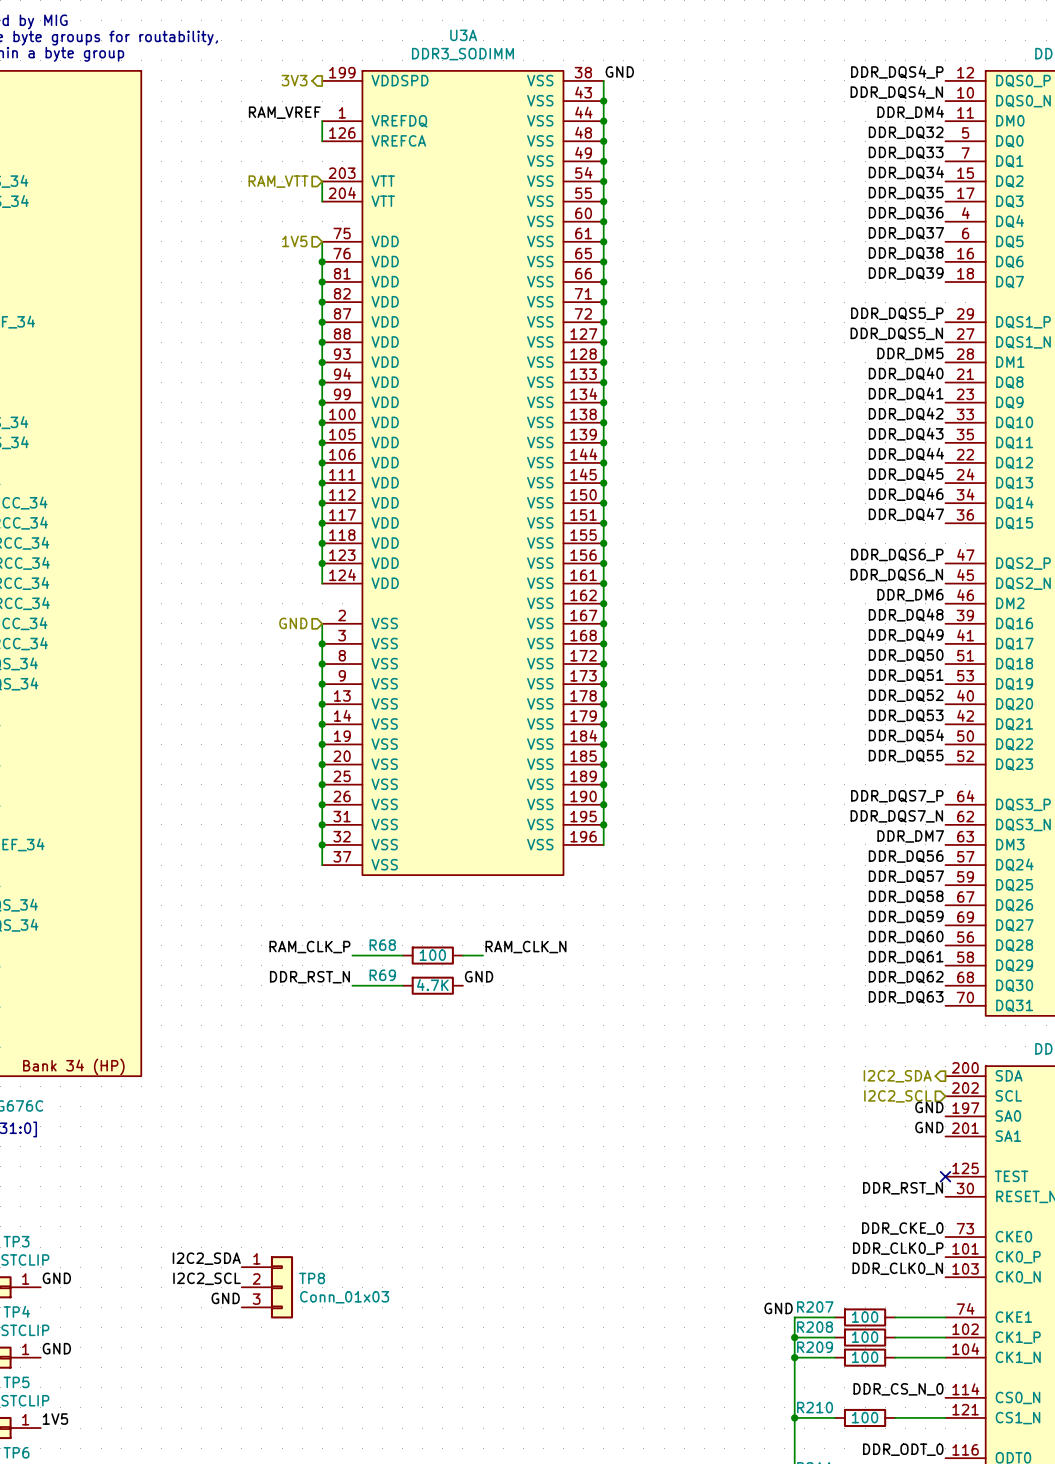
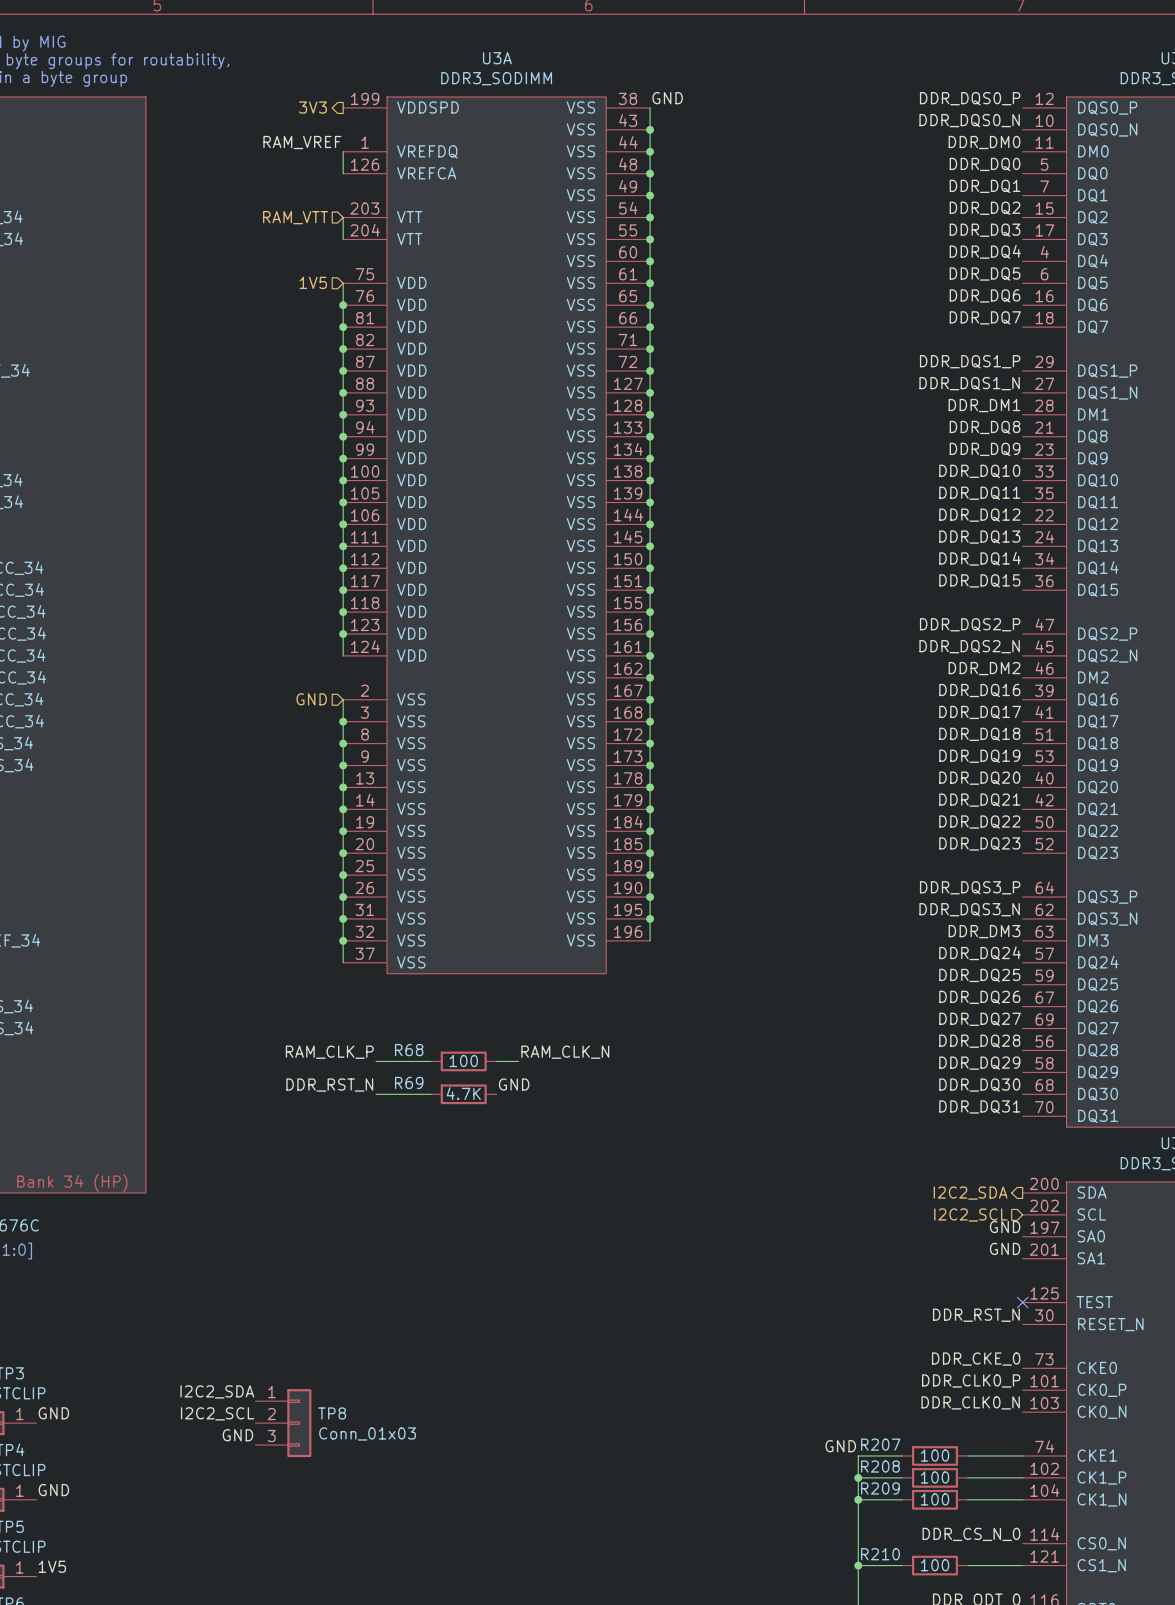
label: DDR_DQS4_P (897, 72) -> DDR_DQS0_P (970, 98)
label: DDR_DQS4_N (896, 92) -> DDR_DQS0_N (969, 120)
label: DDR_DM4 (910, 112) -> DDR_DM0 (984, 142)
label: DDR_DQ32 (906, 132) -> DDR_DQ0 (985, 164)
label: DDR_DQ33 (906, 152) -> DDR_DQ1 (985, 186)
label: DDR_DQ34 (906, 172) -> DDR_DQ2 (985, 208)
label: DDR_DQ35 (906, 193) -> DDR_DQ3 (985, 230)
label: DDR_DQ36 (906, 213) -> DDR_DQ4 (985, 251)
label: DDR_DQ37 (906, 233) -> DDR_DQ5 (985, 274)
label: DDR_DQ38 (906, 253) -> DDR_DQ6 (985, 295)
label: DDR_DQ39 (906, 273) -> DDR_DQ7 (985, 317)
label: DDR_DQS5_P (897, 313) -> DDR_DQS1_P (970, 361)
label: DDR_DQS5_N (896, 333) -> DDR_DQS1_N (969, 383)
label: DDR_DM5 (910, 353) -> DDR_DM1 (984, 405)
label: DDR_DQ40 (906, 373) -> DDR_DQ8 (985, 427)
label: DDR_DQ41 (906, 393) -> DDR_DQ9 (985, 449)
label: DDR_DQ42 (906, 414) -> DDR_DQ10 (979, 471)
label: DDR_DQ43 (906, 434) -> DDR_DQ11 (979, 493)
label: DDR_DQ44 (906, 454) -> DDR_DQ12 (979, 515)
label: DDR_DQ45 (906, 474) -> DDR_DQ13 (979, 537)
label: DDR_DQ46 (906, 494) -> DDR_DQ14 (980, 558)
label: DDR_DQ47 (906, 514) -> DDR_DQ15 (979, 580)
label: DDR_DQS6_P (897, 555) -> DDR_DQS2_P (970, 624)
label: DDR_DQS6_N (896, 575) -> DDR_DQS2_N (969, 646)
label: DDR_DM6 (910, 595) -> DDR_DM2 (984, 668)
label: DDR_DQ48 (906, 615) -> DDR_DQ16 (979, 690)
label: DDR_DQ49 (906, 635) -> DDR_DQ17 (980, 712)
label: DDR_DQ50 (906, 655) -> DDR_DQ18 (979, 734)
label: DDR_DQ51 (906, 675) -> DDR_DQ19 (979, 756)
label: DDR_DQ52 (906, 695) -> DDR_DQ20 (979, 778)
label: DDR_DQ53 (906, 715) -> DDR_DQ21 (979, 800)
label: DDR_DQ54 (906, 735) -> DDR_DQ22 (979, 822)
label: DDR_DQ55 (906, 756) -> DDR_DQ23 (979, 843)
label: DDR_DQS7_P (897, 796) -> DDR_DQS3_P (970, 887)
label: DDR_DQS7_N (896, 816) -> DDR_DQS3_N (969, 909)
label: DDR_DM7 (910, 836) -> DDR_DM3 (984, 931)
label: DDR_DQ56 (906, 856) -> DDR_DQ24 (980, 953)
label: DDR_DQ57 (906, 876) -> DDR_DQ25 (979, 975)
label: DDR_DQ58 (906, 896) -> DDR_DQ26 (979, 997)
label: DDR_DQ59 (906, 916) -> DDR_DQ27 (980, 1019)
label: DDR_DQ60 (906, 937) -> DDR_DQ28 (979, 1041)
label: DDR_DQ61 (906, 957) -> DDR_DQ29 (979, 1063)
label: DDR_DQ62 (906, 977) -> DDR_DQ30 (979, 1085)
label: DDR_DQ63 (906, 997) -> DDR_DQ31 (979, 1106)

